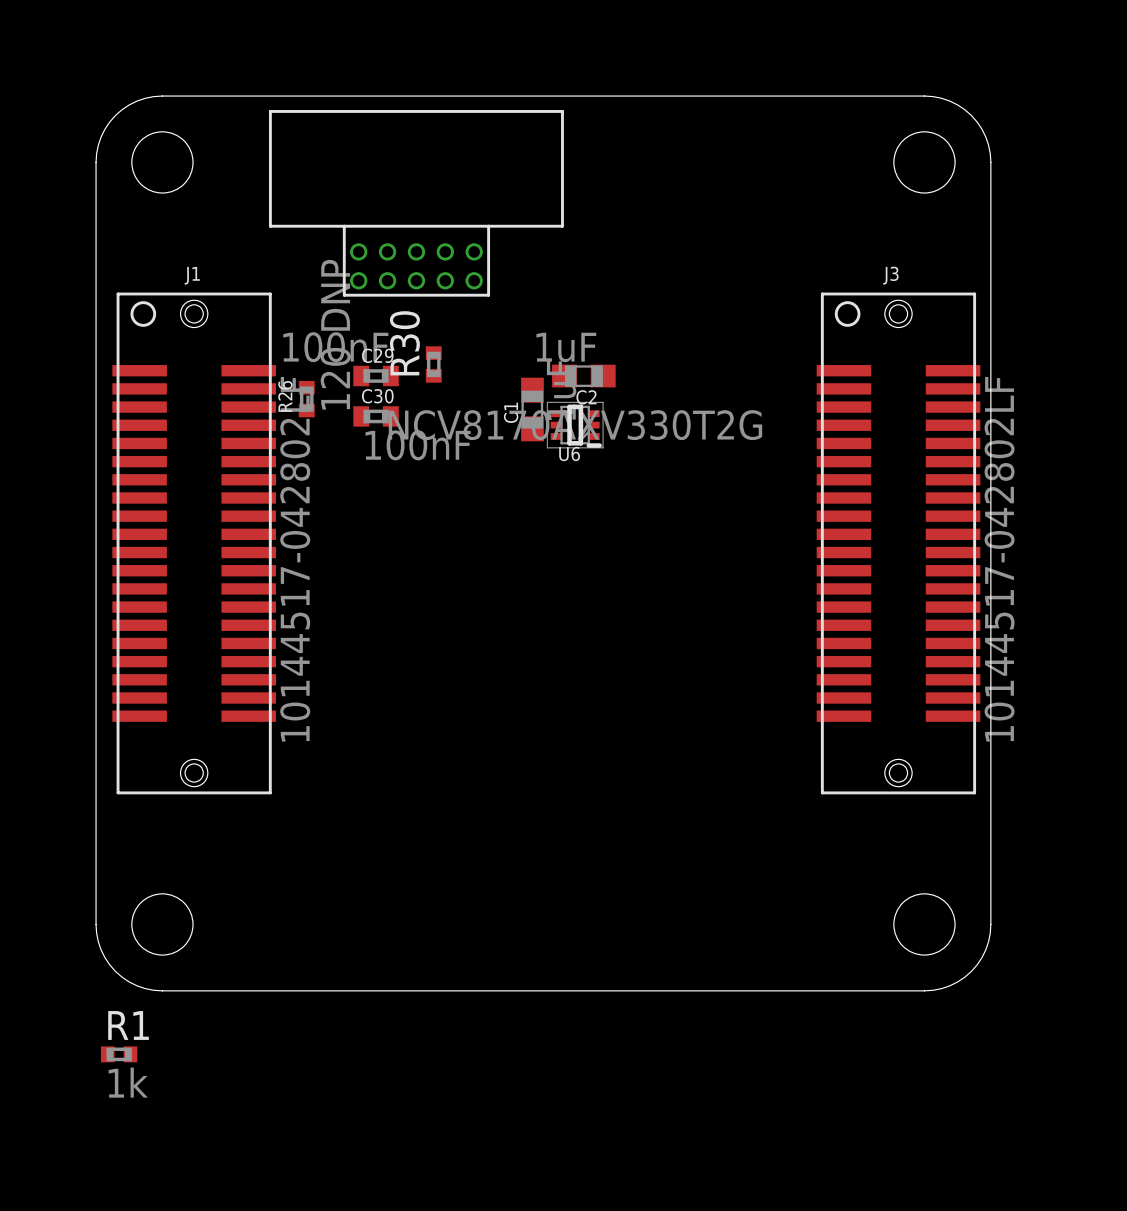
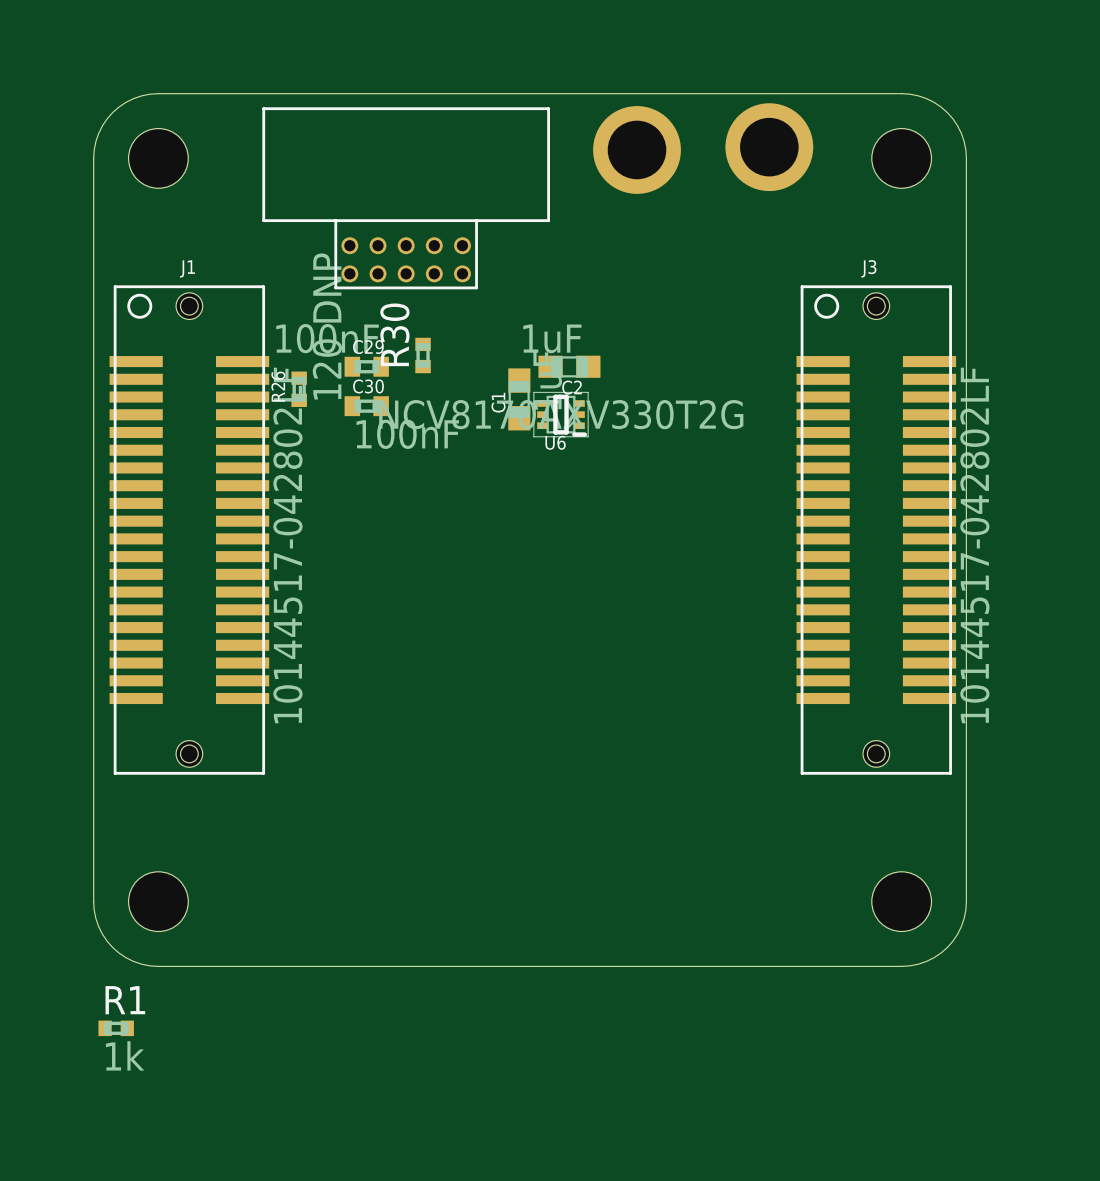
part: none -> (769, 147)
part: none -> (637, 149)

